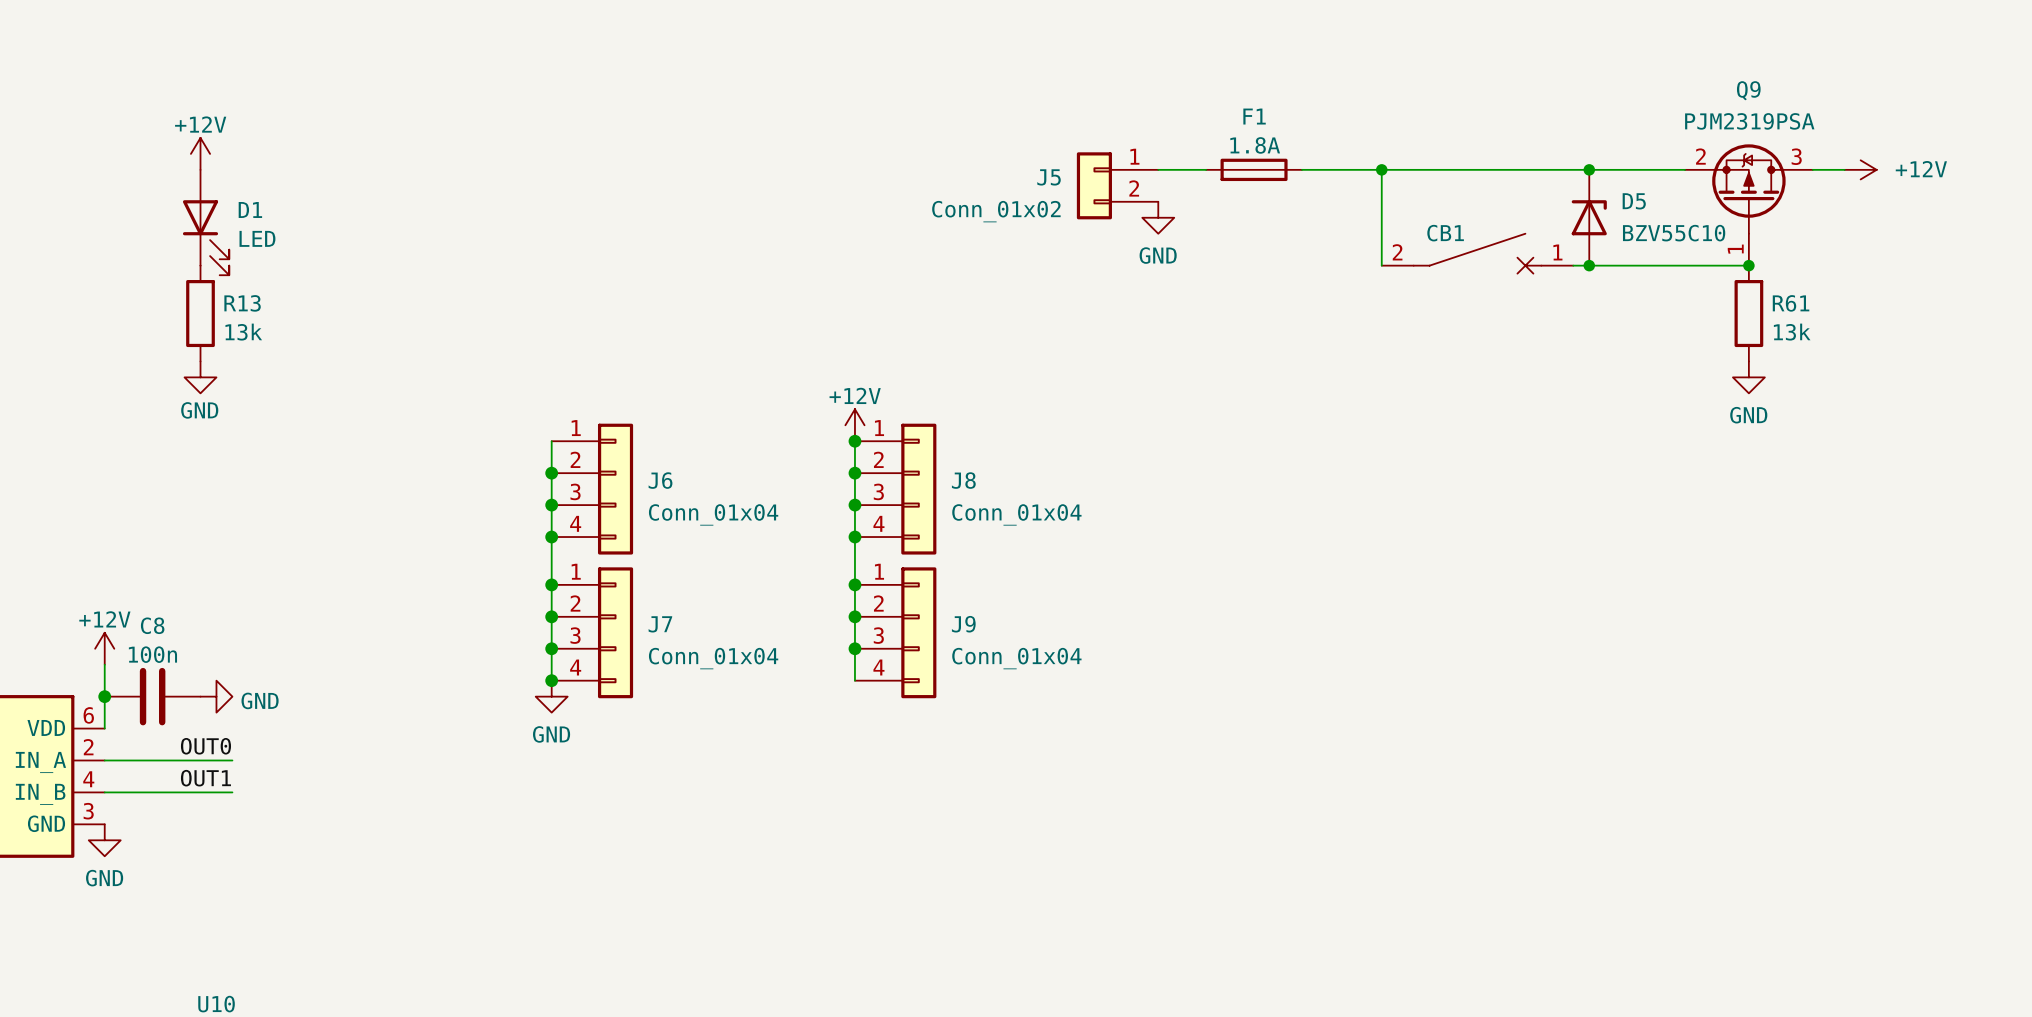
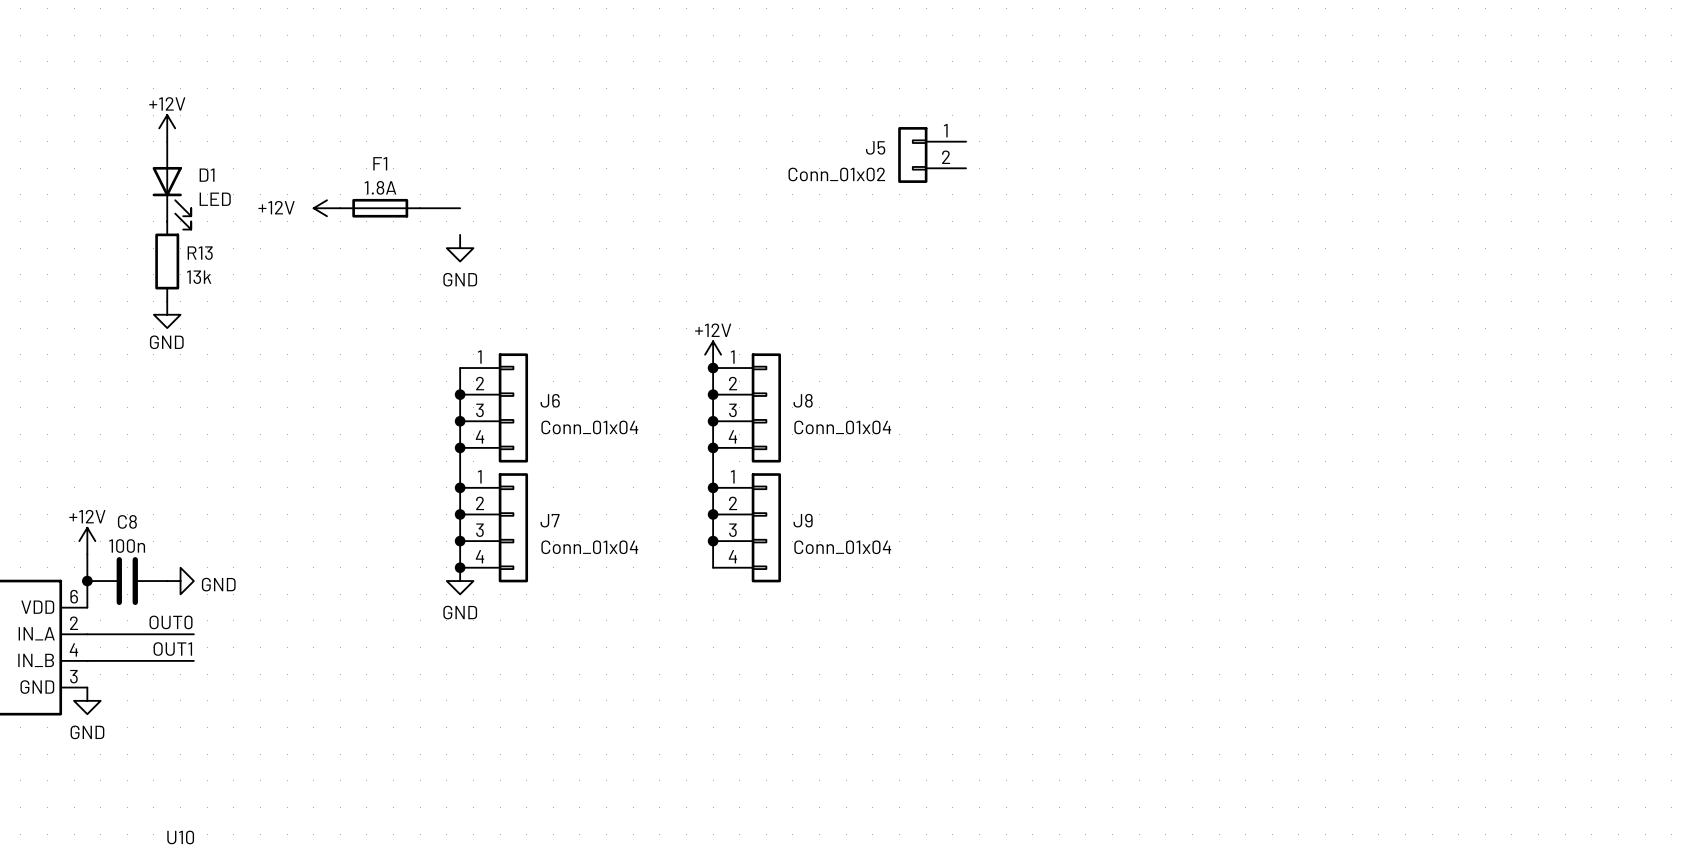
wire: (1158, 169) (1206, 169) -> none
F1 position: (1254, 169) -> (380, 208)
wire: (1301, 169) (1685, 169) -> none
wire: (1381, 169) (1381, 265) -> none
junction: (1381, 169) -> none
junction: (1589, 169) -> none
wire: (1812, 169) (1844, 169) -> none
power symbol: +12V (1860, 169) -> none
Q9: PJM2319PSA (1748, 204) -> none
power symbol: GND (1158, 217) -> none
D5: BZV55C10 (1589, 217) -> none
power symbol: none -> +12V (327, 208)
wire: none -> (420, 208) (460, 208)
CB1: (1477, 253) -> none
wire: (1573, 265) (1748, 265) -> none
junction: (1589, 265) -> none
junction: (1748, 265) -> none
power symbol: none -> GND (460, 248)
R61: 13k (1748, 313) -> none
power symbol: GND (1748, 377) -> none

